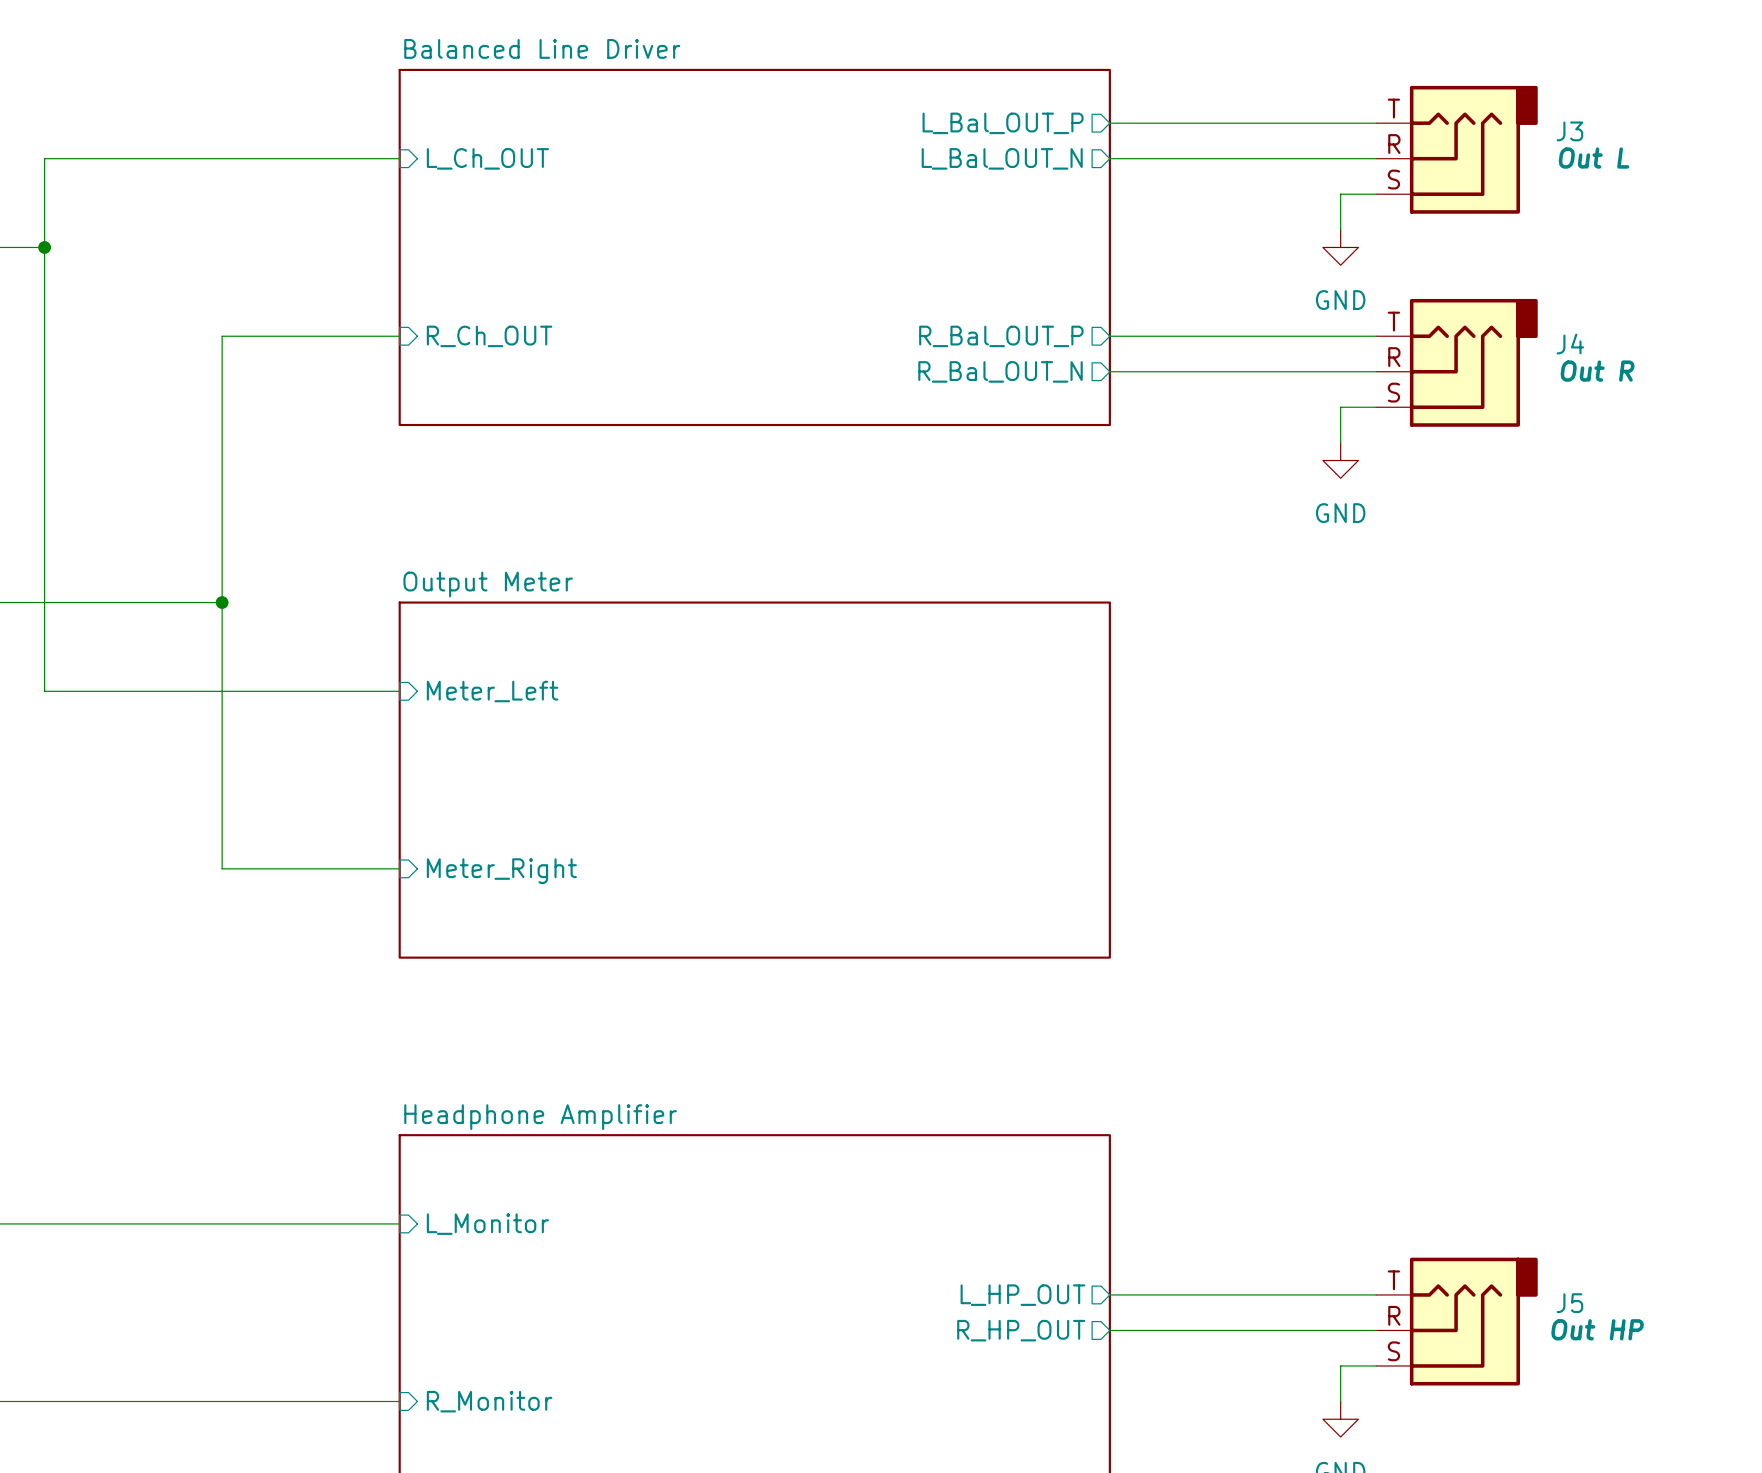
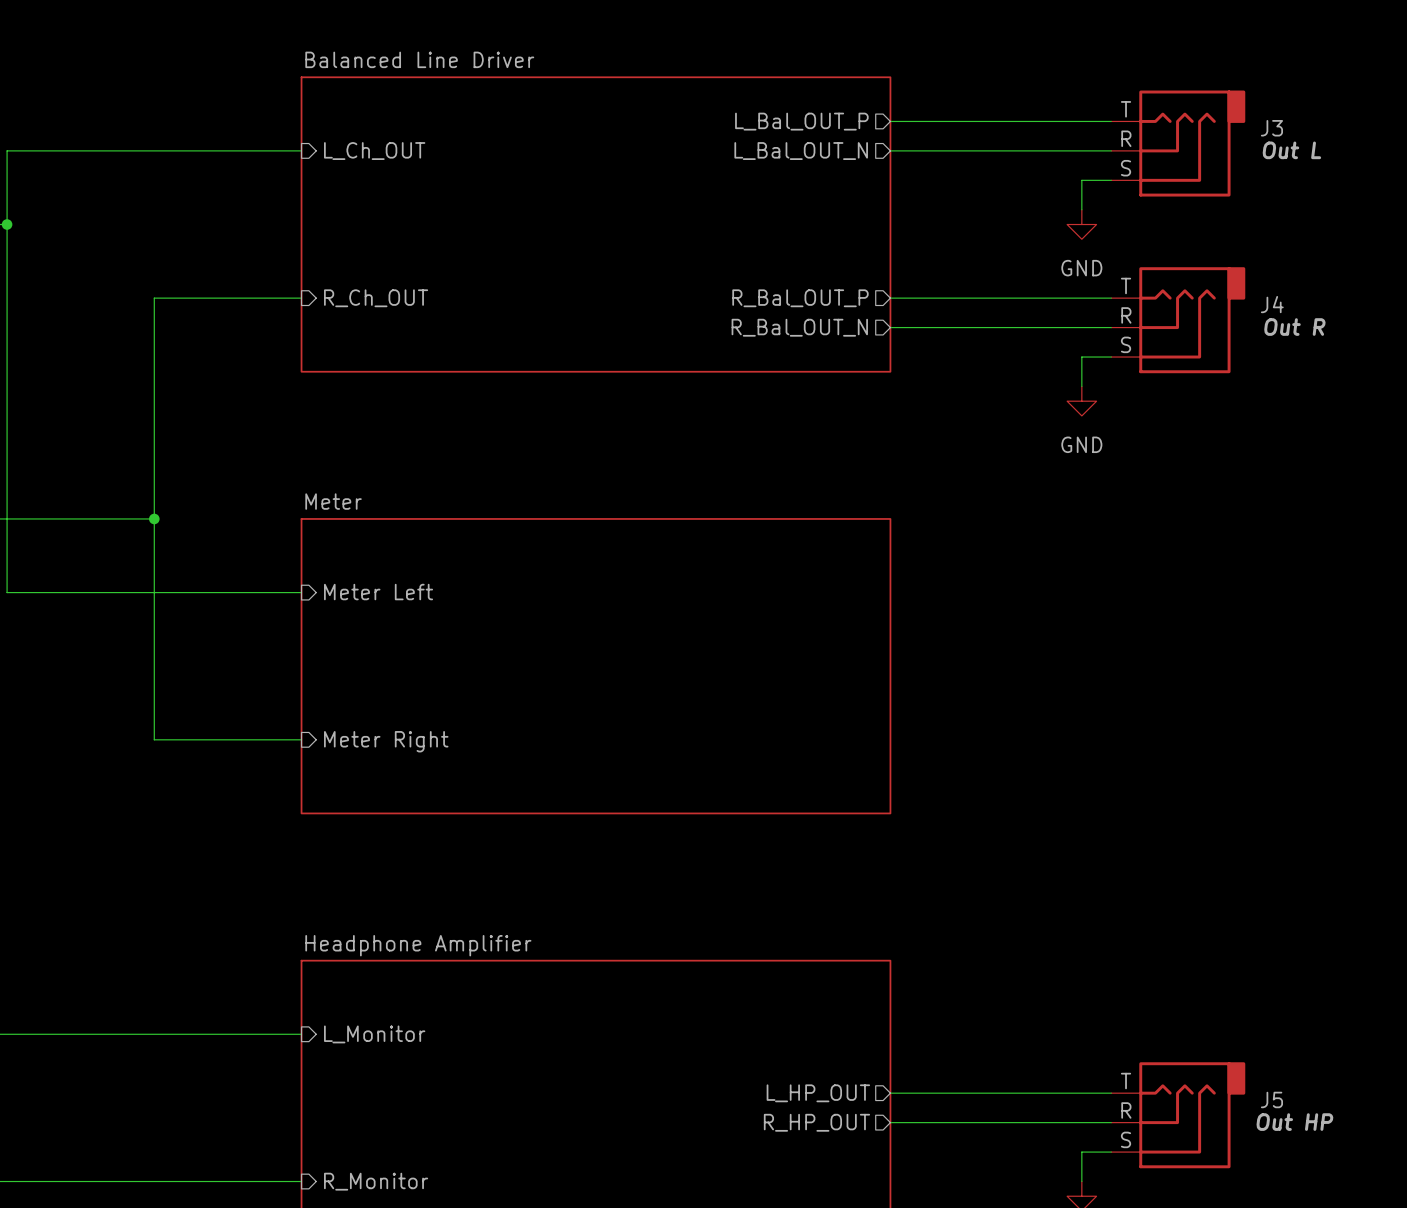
sheet Output Meter name: Output Meter (488, 584) -> Meter (333, 501)
sheet pin: Meter_Left (492, 691) -> Meter Left (378, 592)
sheet pin: Meter_Right (501, 871) -> Meter Right (386, 741)

